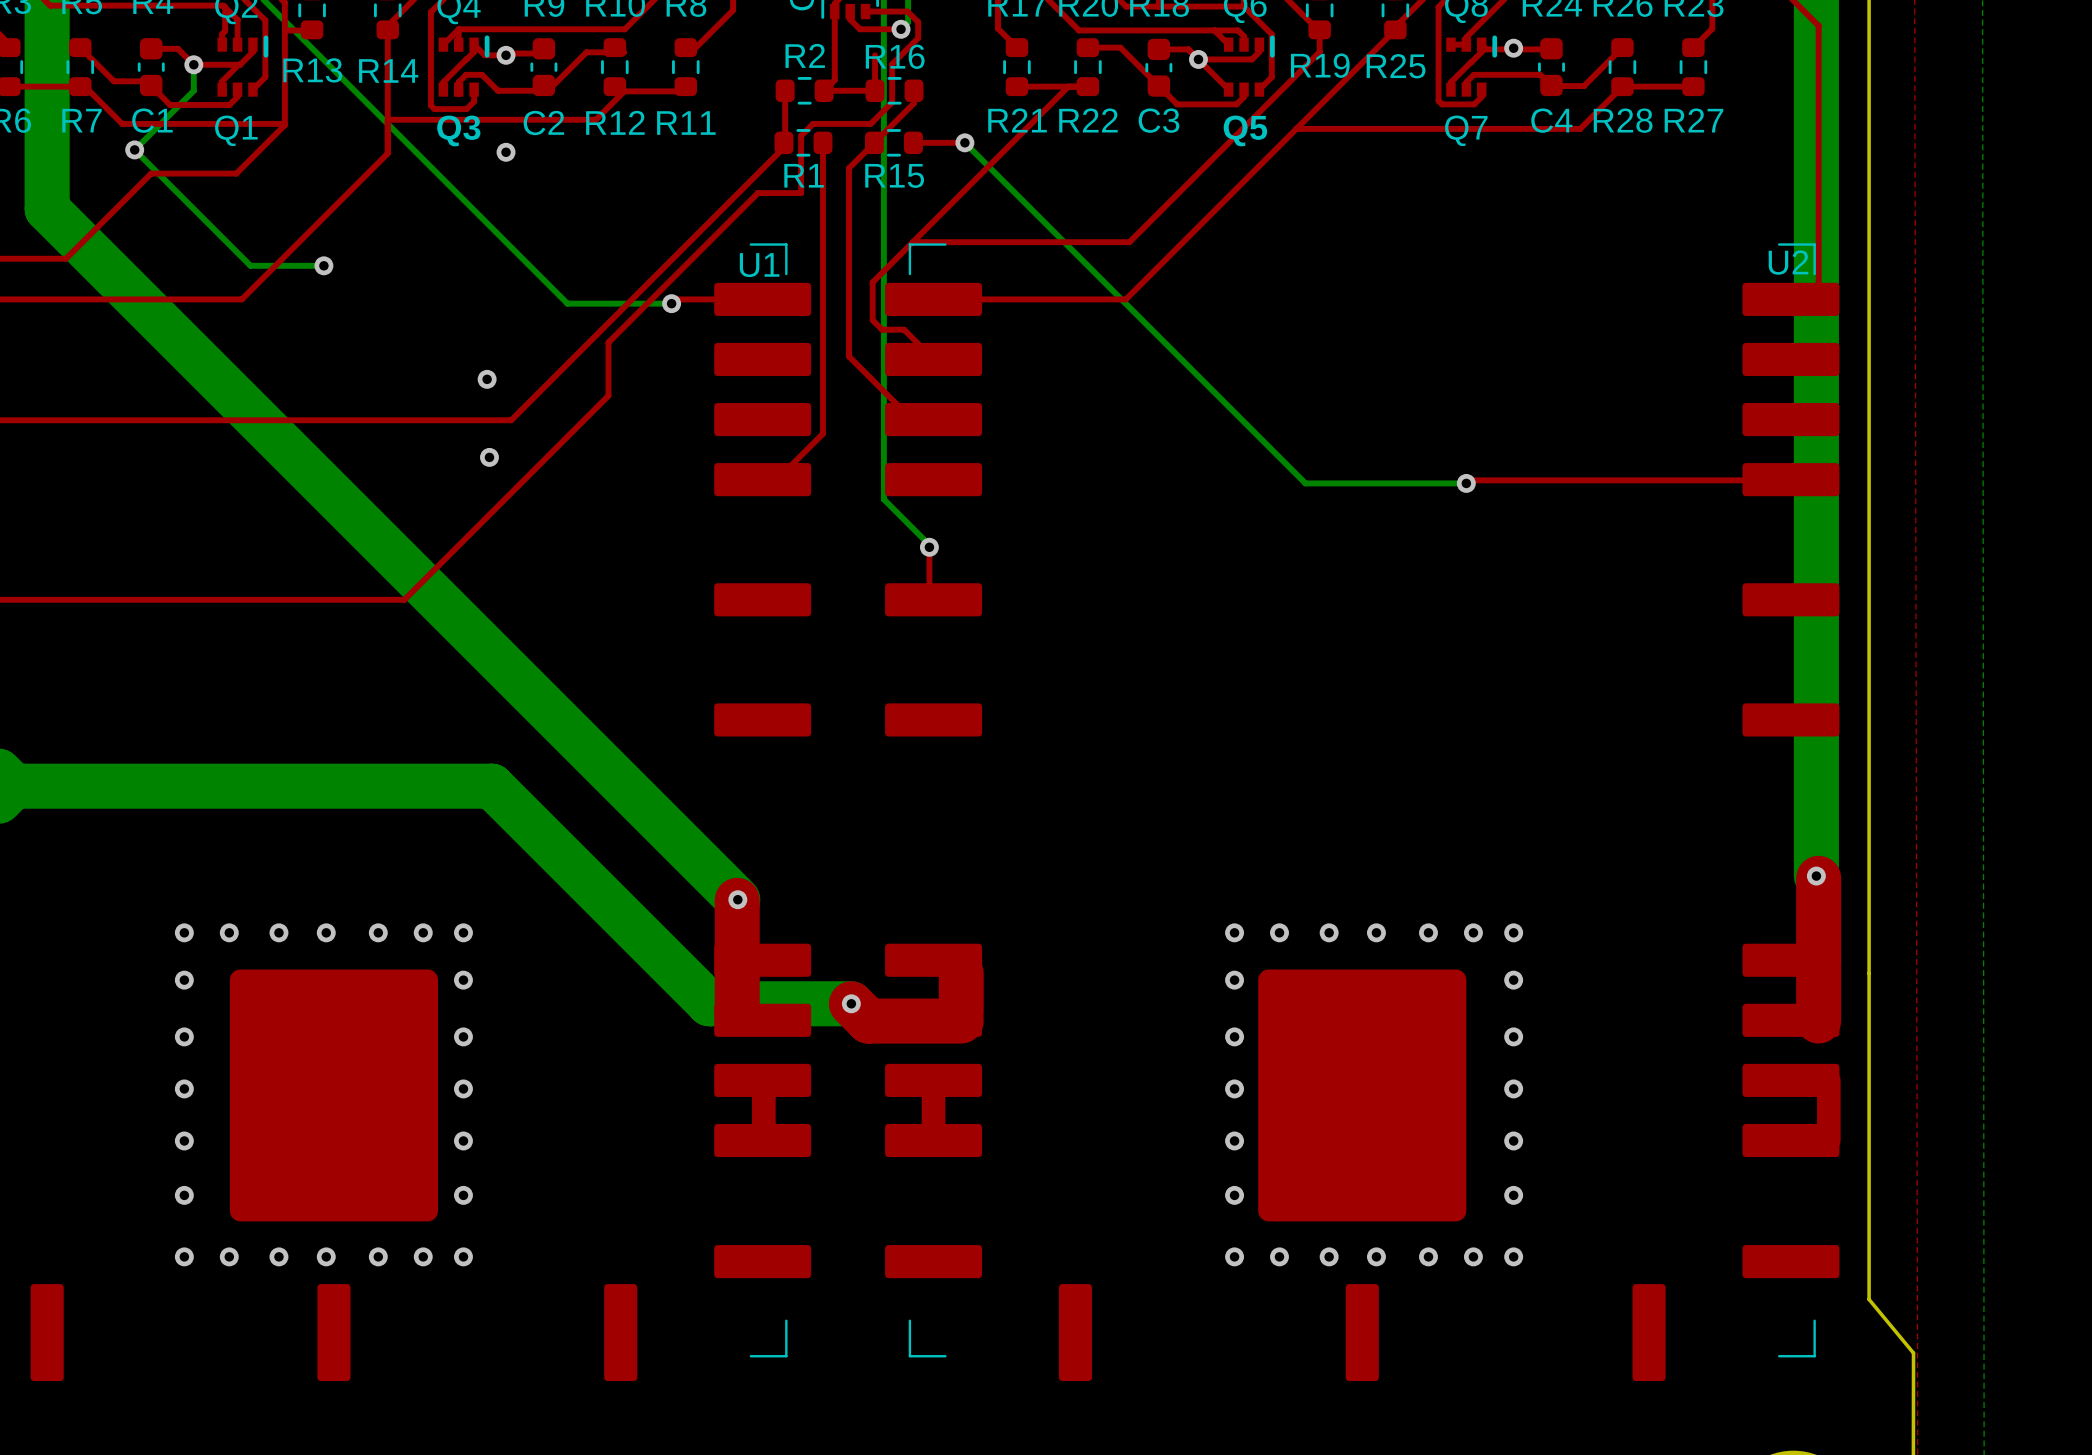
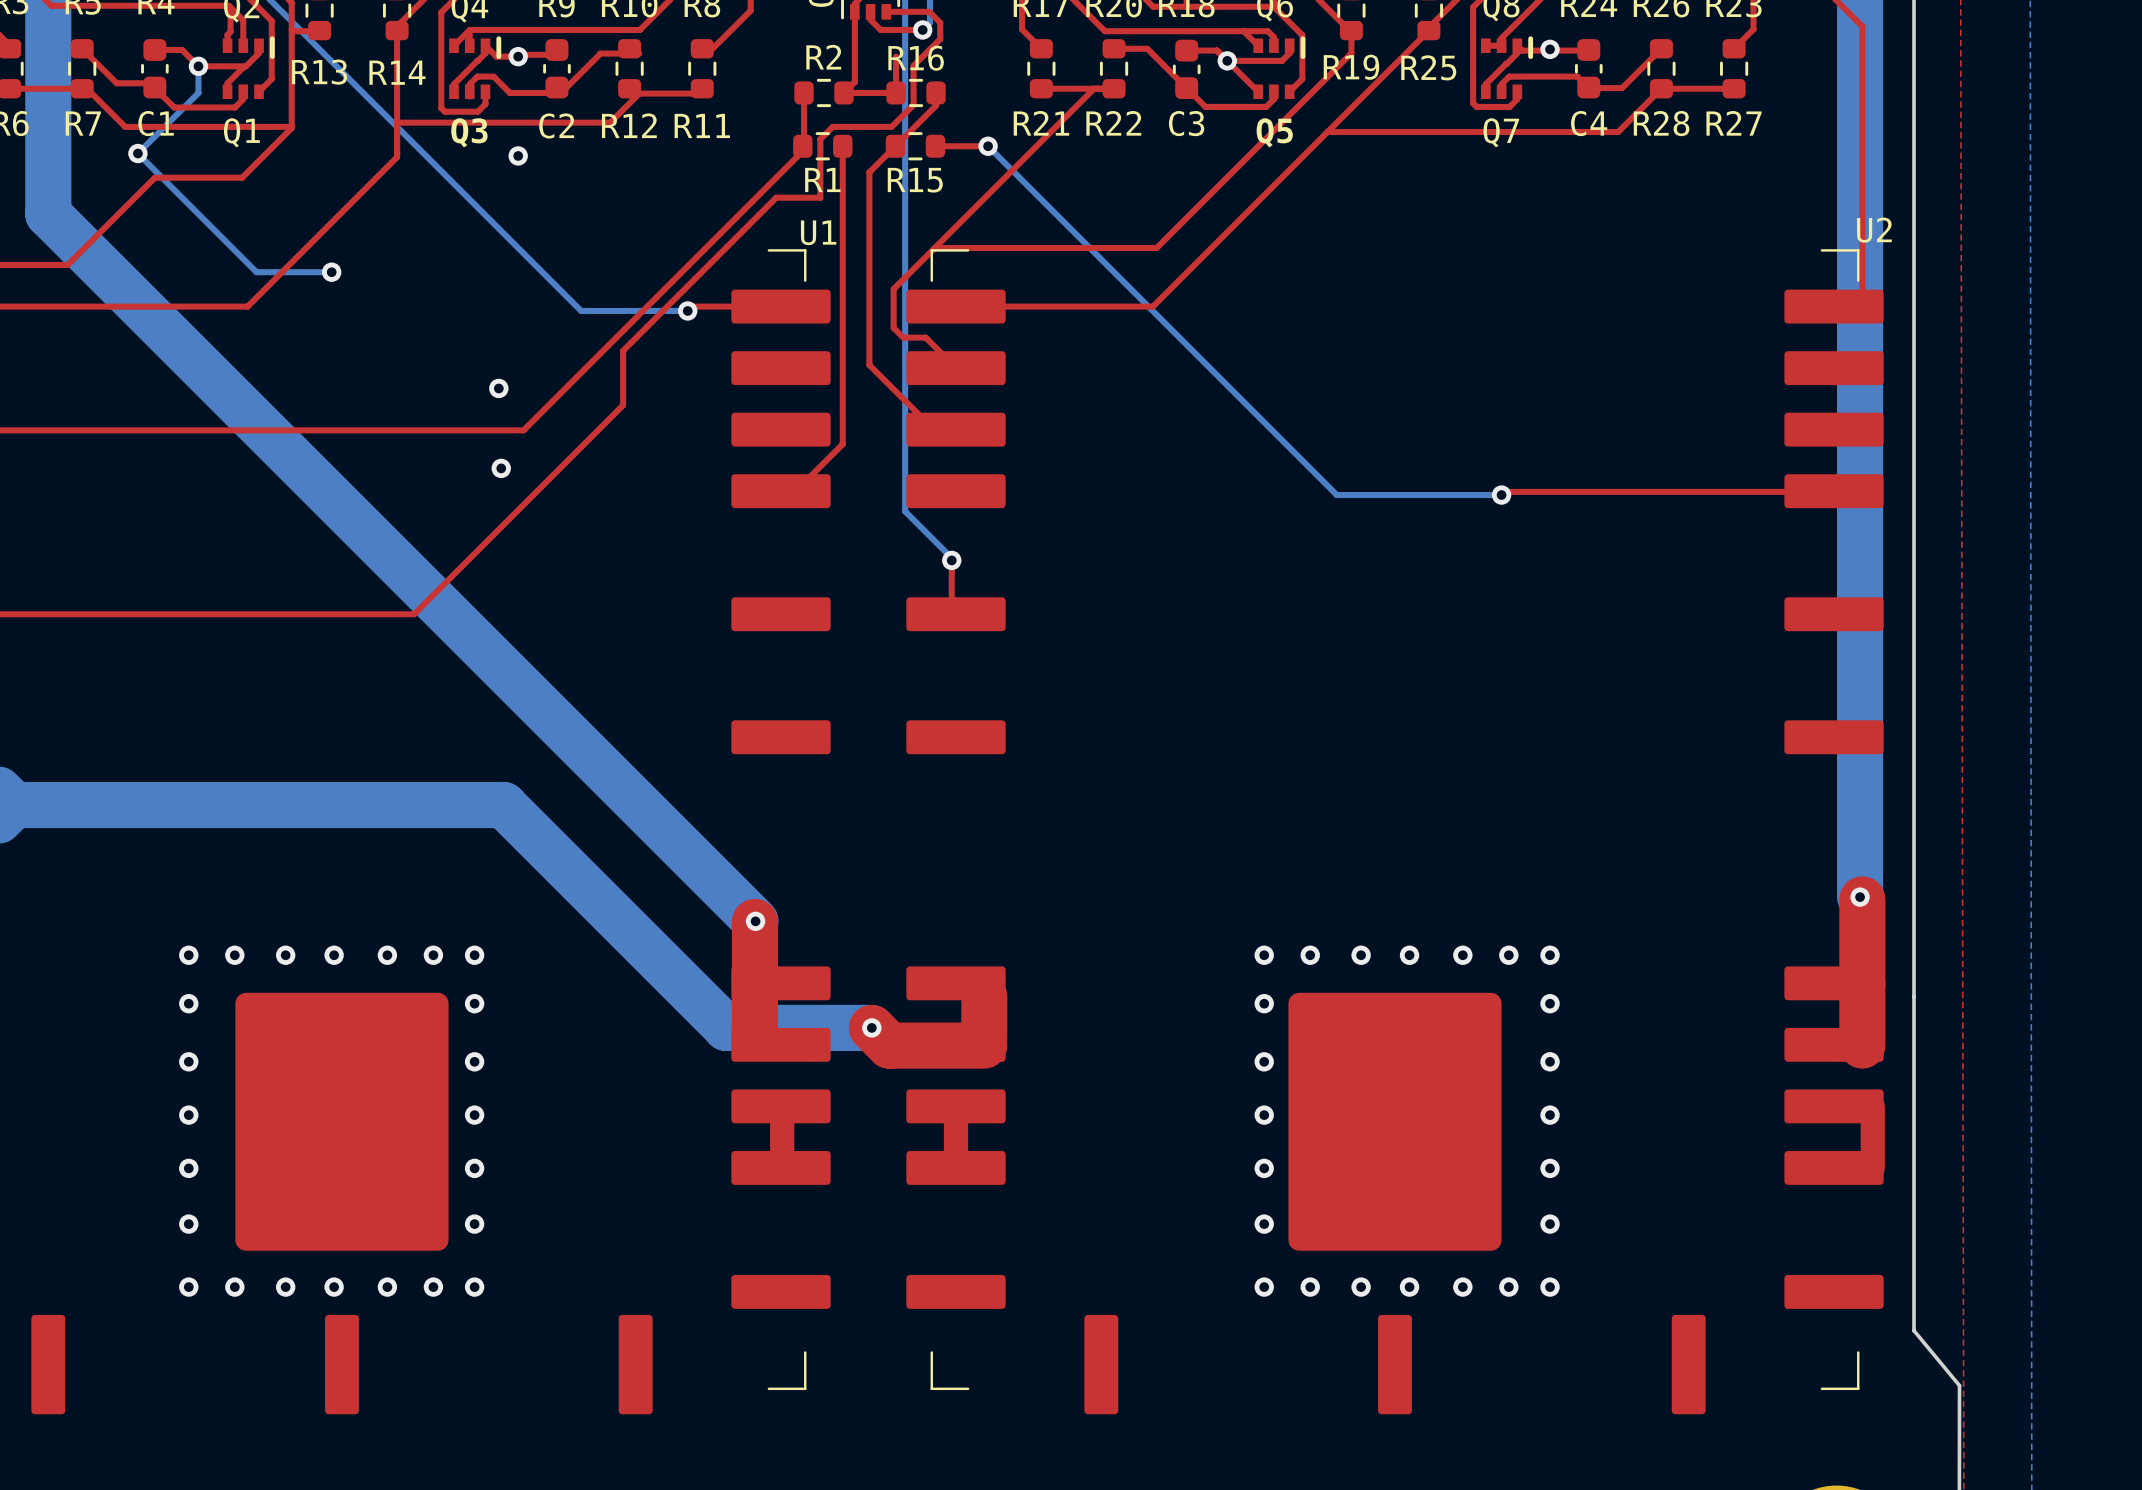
U2 name position: U2 (1788, 262) -> U2 (1874, 230)
U1 name position: U1 (759, 265) -> U1 (818, 232)

